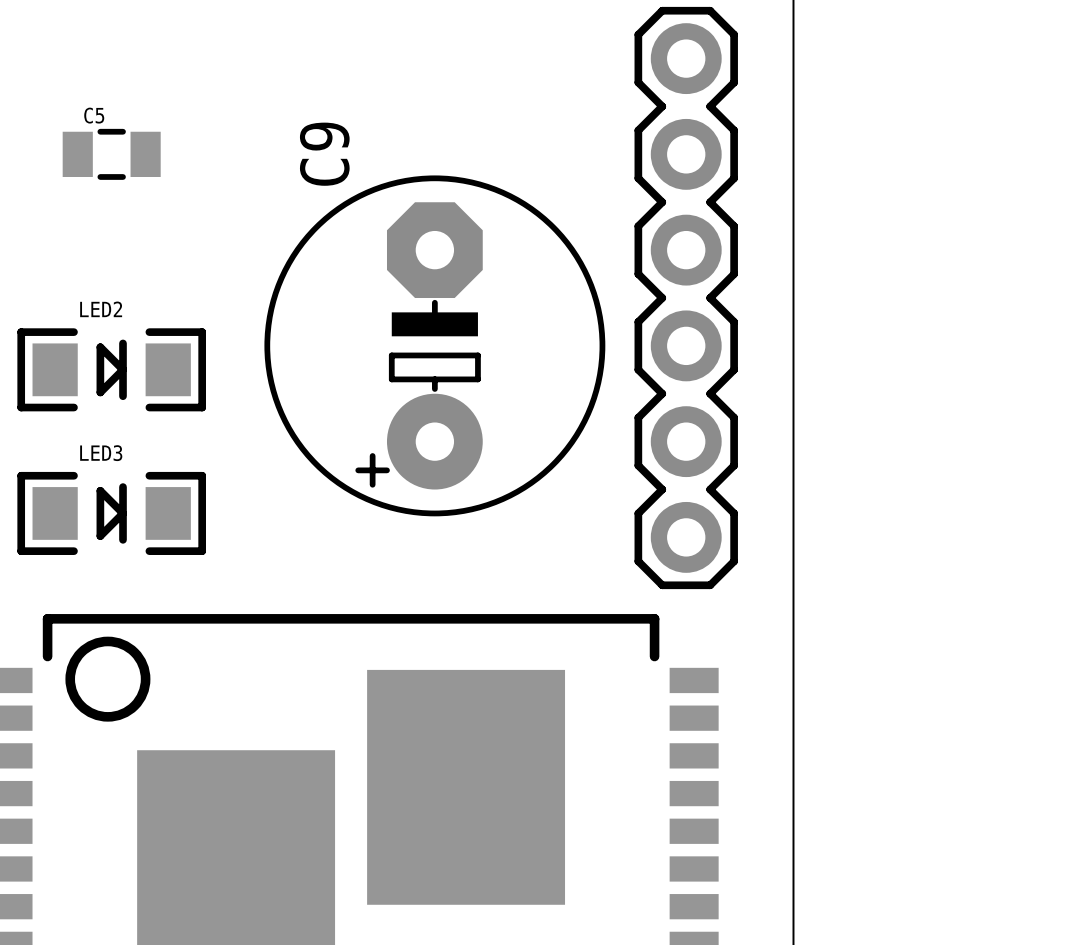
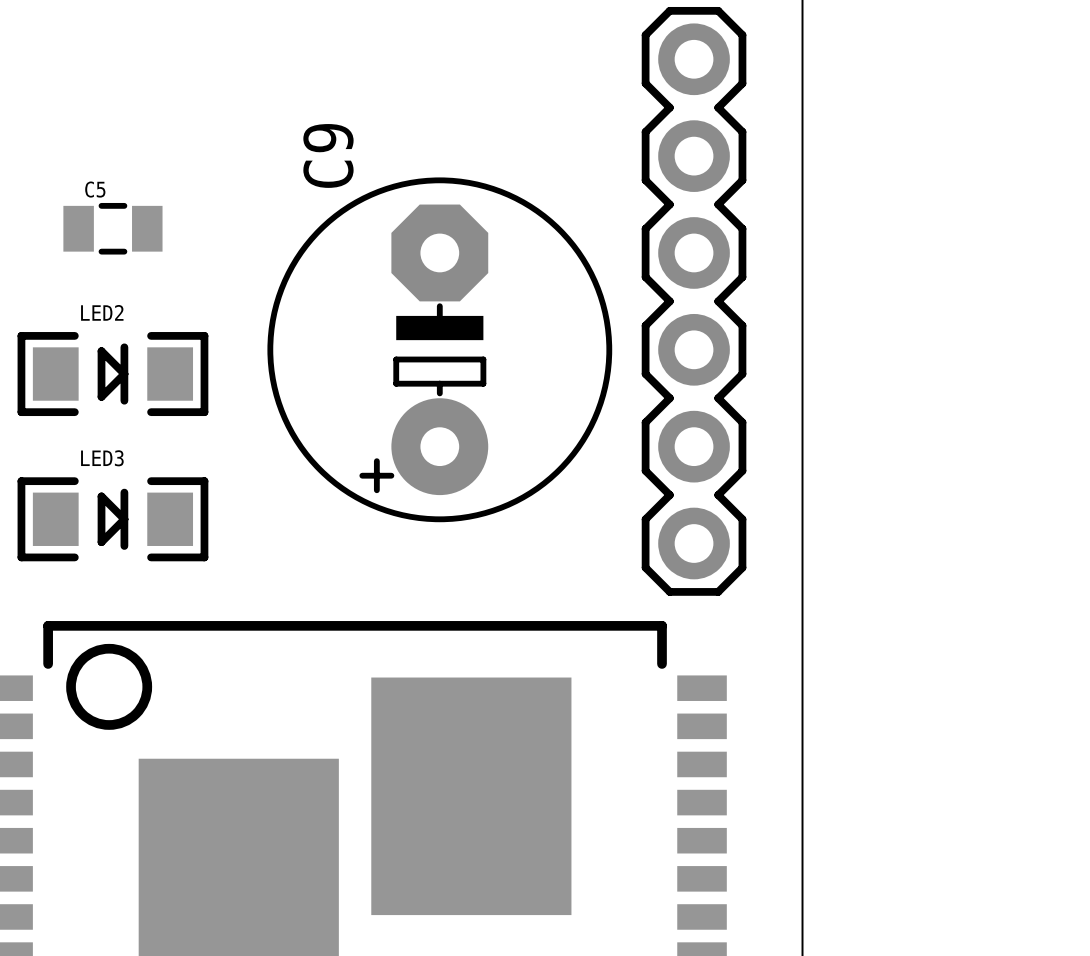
C5 position: (111, 154) -> (112, 228)

